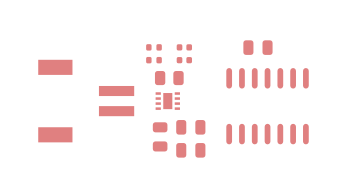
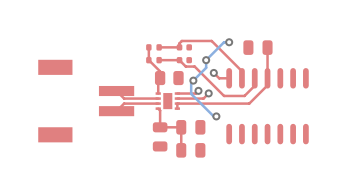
bottom track: none -> (229, 42) (224, 42) (206, 60) (206, 67) (191, 82) (191, 93) (213, 116) (216, 116)
via: none -> (229, 42)
top track: none -> (148, 47) (148, 60) (160, 71) (158, 93)
top track: none -> (159, 47) (179, 47) (181, 40) (211, 40) (241, 71) (241, 78)
top track: none -> (267, 47) (267, 85) (249, 103) (177, 103) (177, 108)
top track: none -> (179, 60) (159, 60)
top track: none -> (179, 60) (185, 66) (194, 66) (224, 95) (244, 95) (254, 85) (254, 78)
via: none -> (206, 60)
top track: none -> (213, 72) (219, 78) (229, 78)
via: none -> (213, 72)
via: none -> (193, 80)
top track: none -> (198, 90) (195, 93) (177, 93)
via: none -> (198, 90)
top track: none -> (116, 91) (124, 98) (158, 98)
top track: none -> (208, 93) (203, 98) (177, 98)
via: none -> (208, 93)
top track: none -> (158, 103) (124, 103) (116, 111)
top track: none -> (158, 108) (160, 110) (160, 127) (181, 127) (181, 150)
via: none -> (216, 116)

